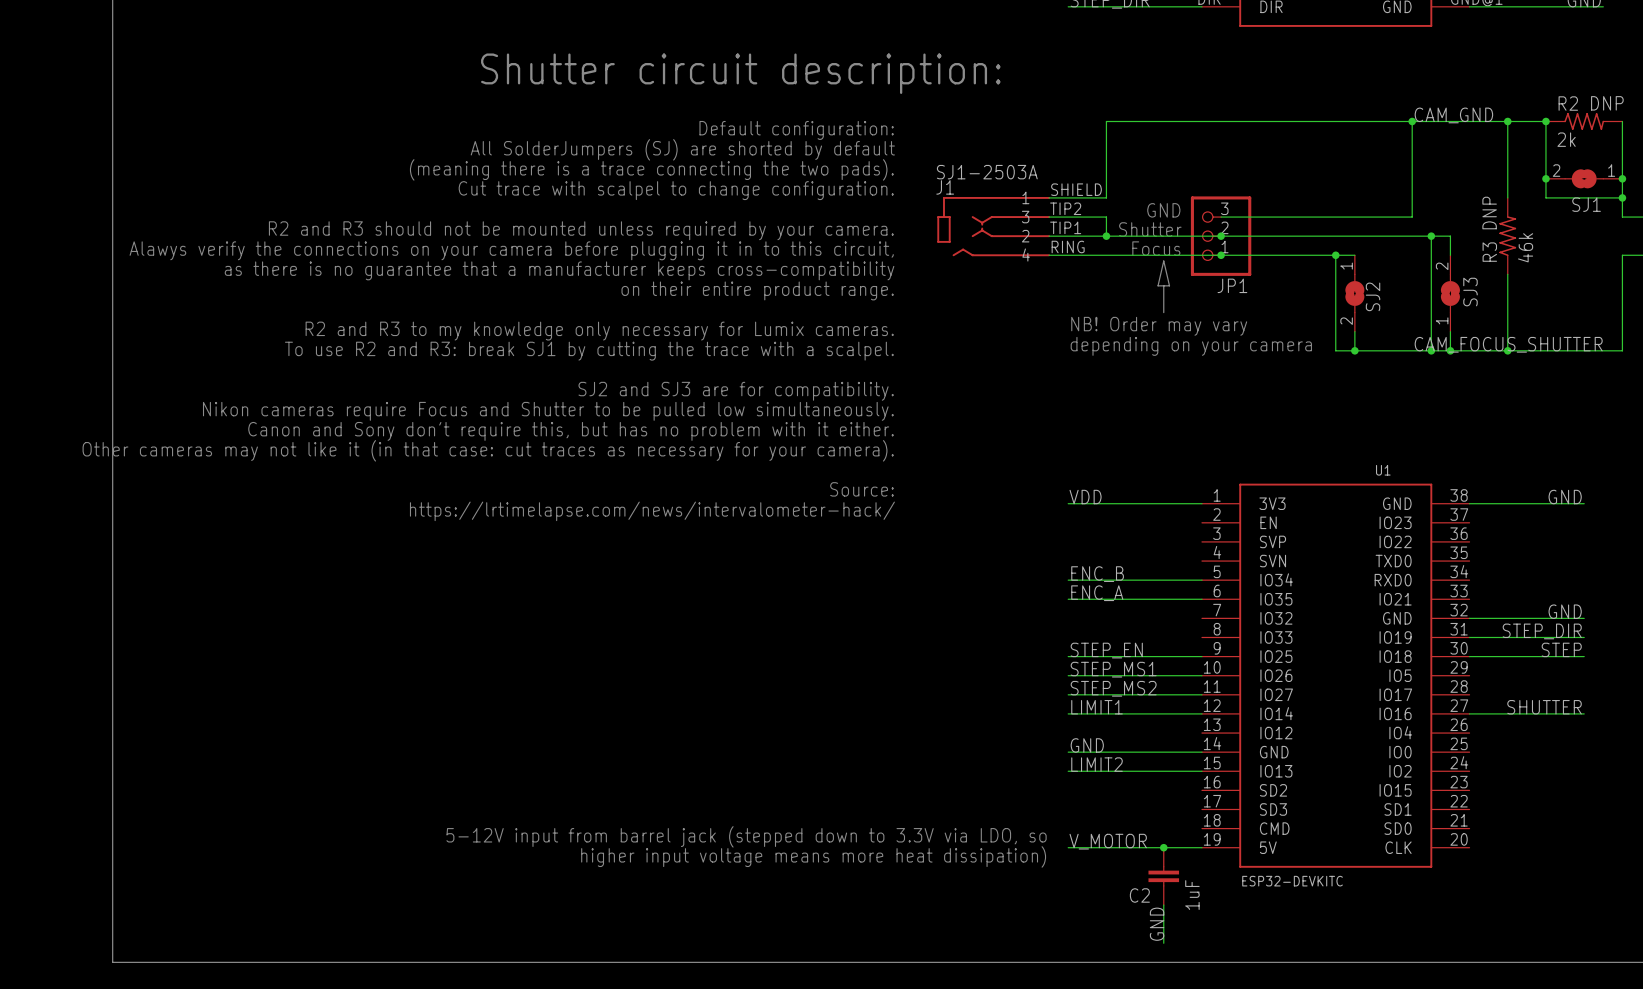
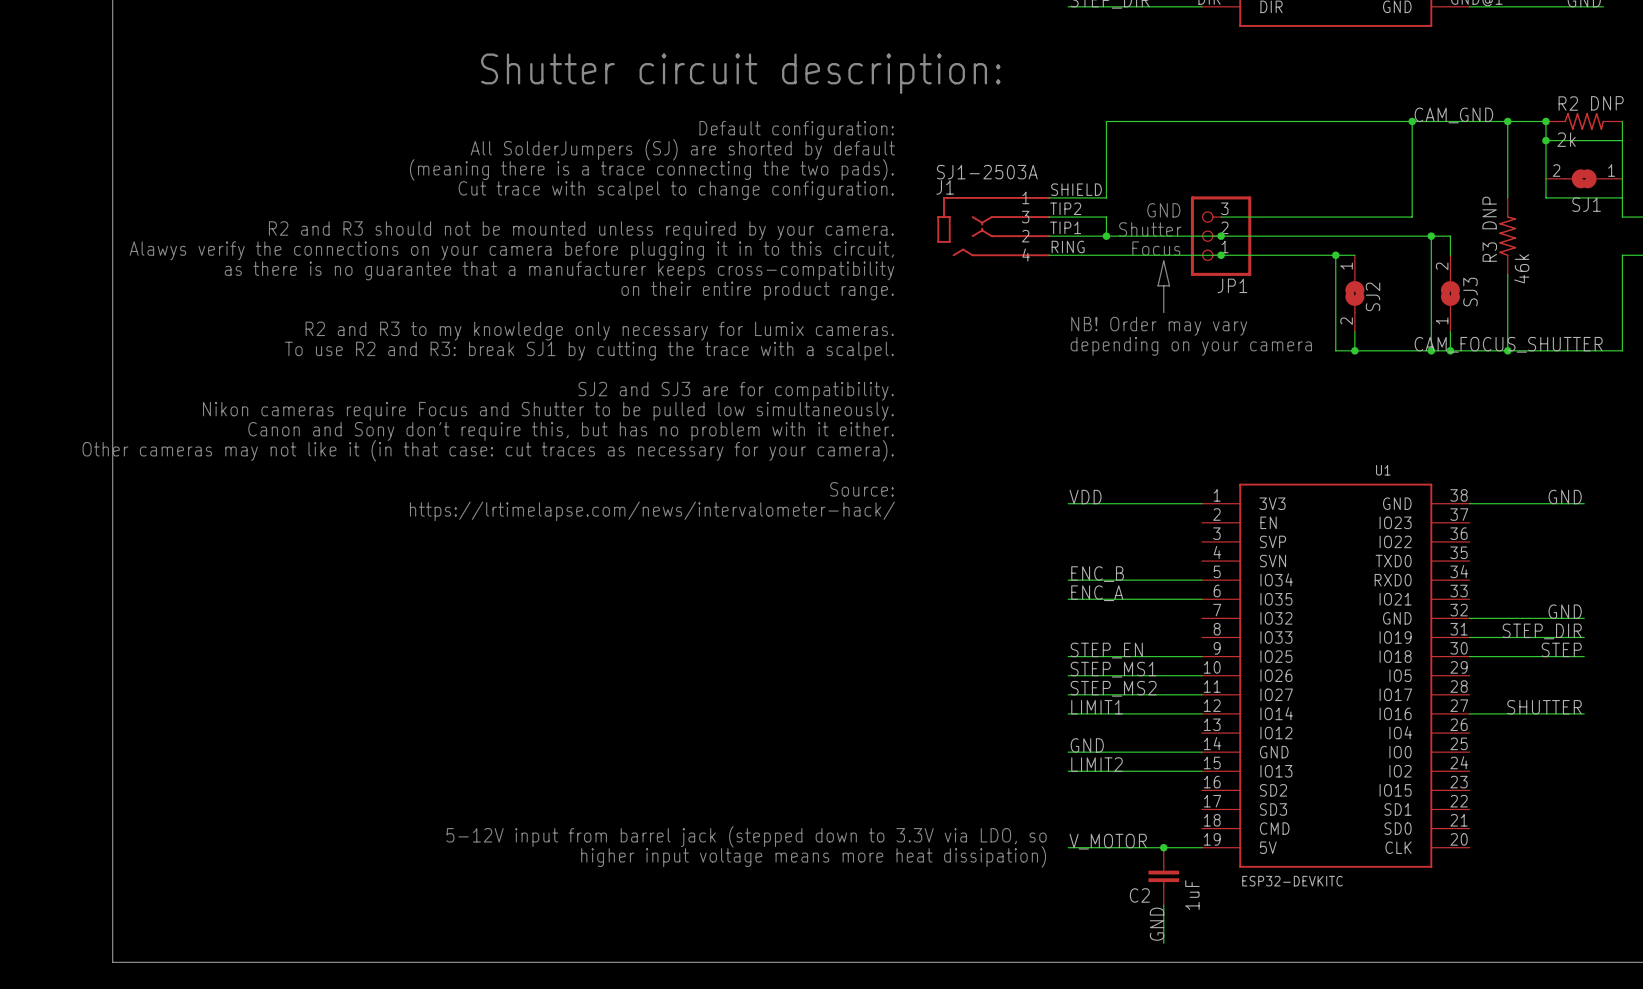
wire: none -> (1545, 140) (1622, 140)
junction position: (1545, 178) -> (1545, 140)
junction: (1622, 178) -> none
junction: (1622, 197) -> none
R3 value position: 46k (1525, 247) -> 46k (1521, 268)

